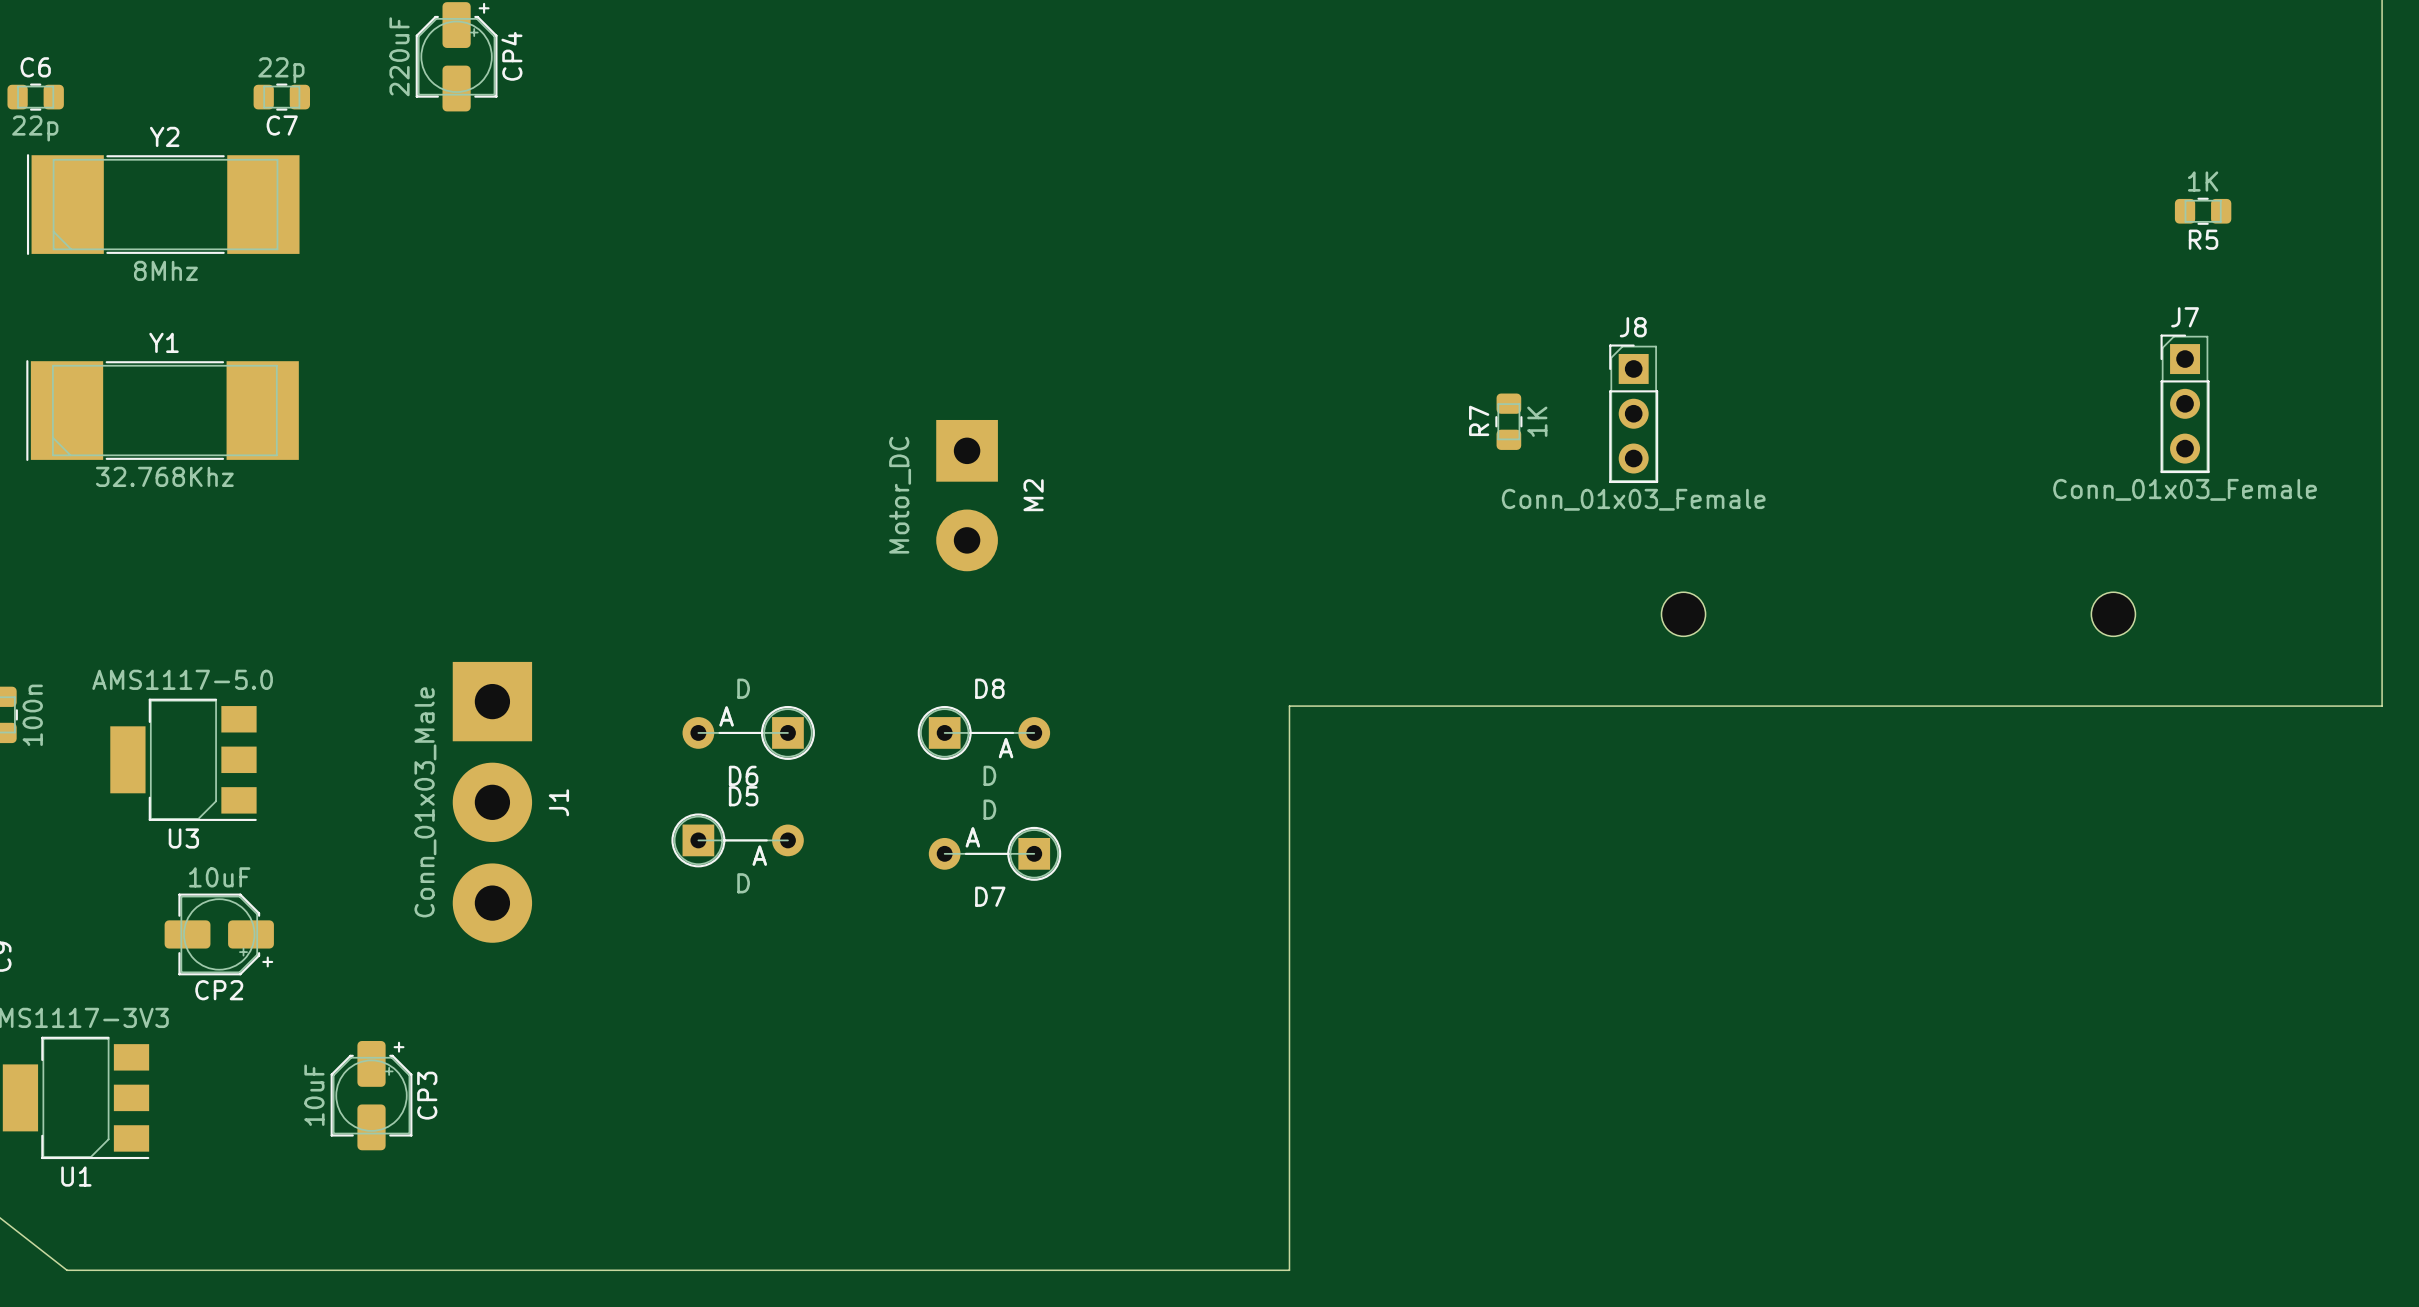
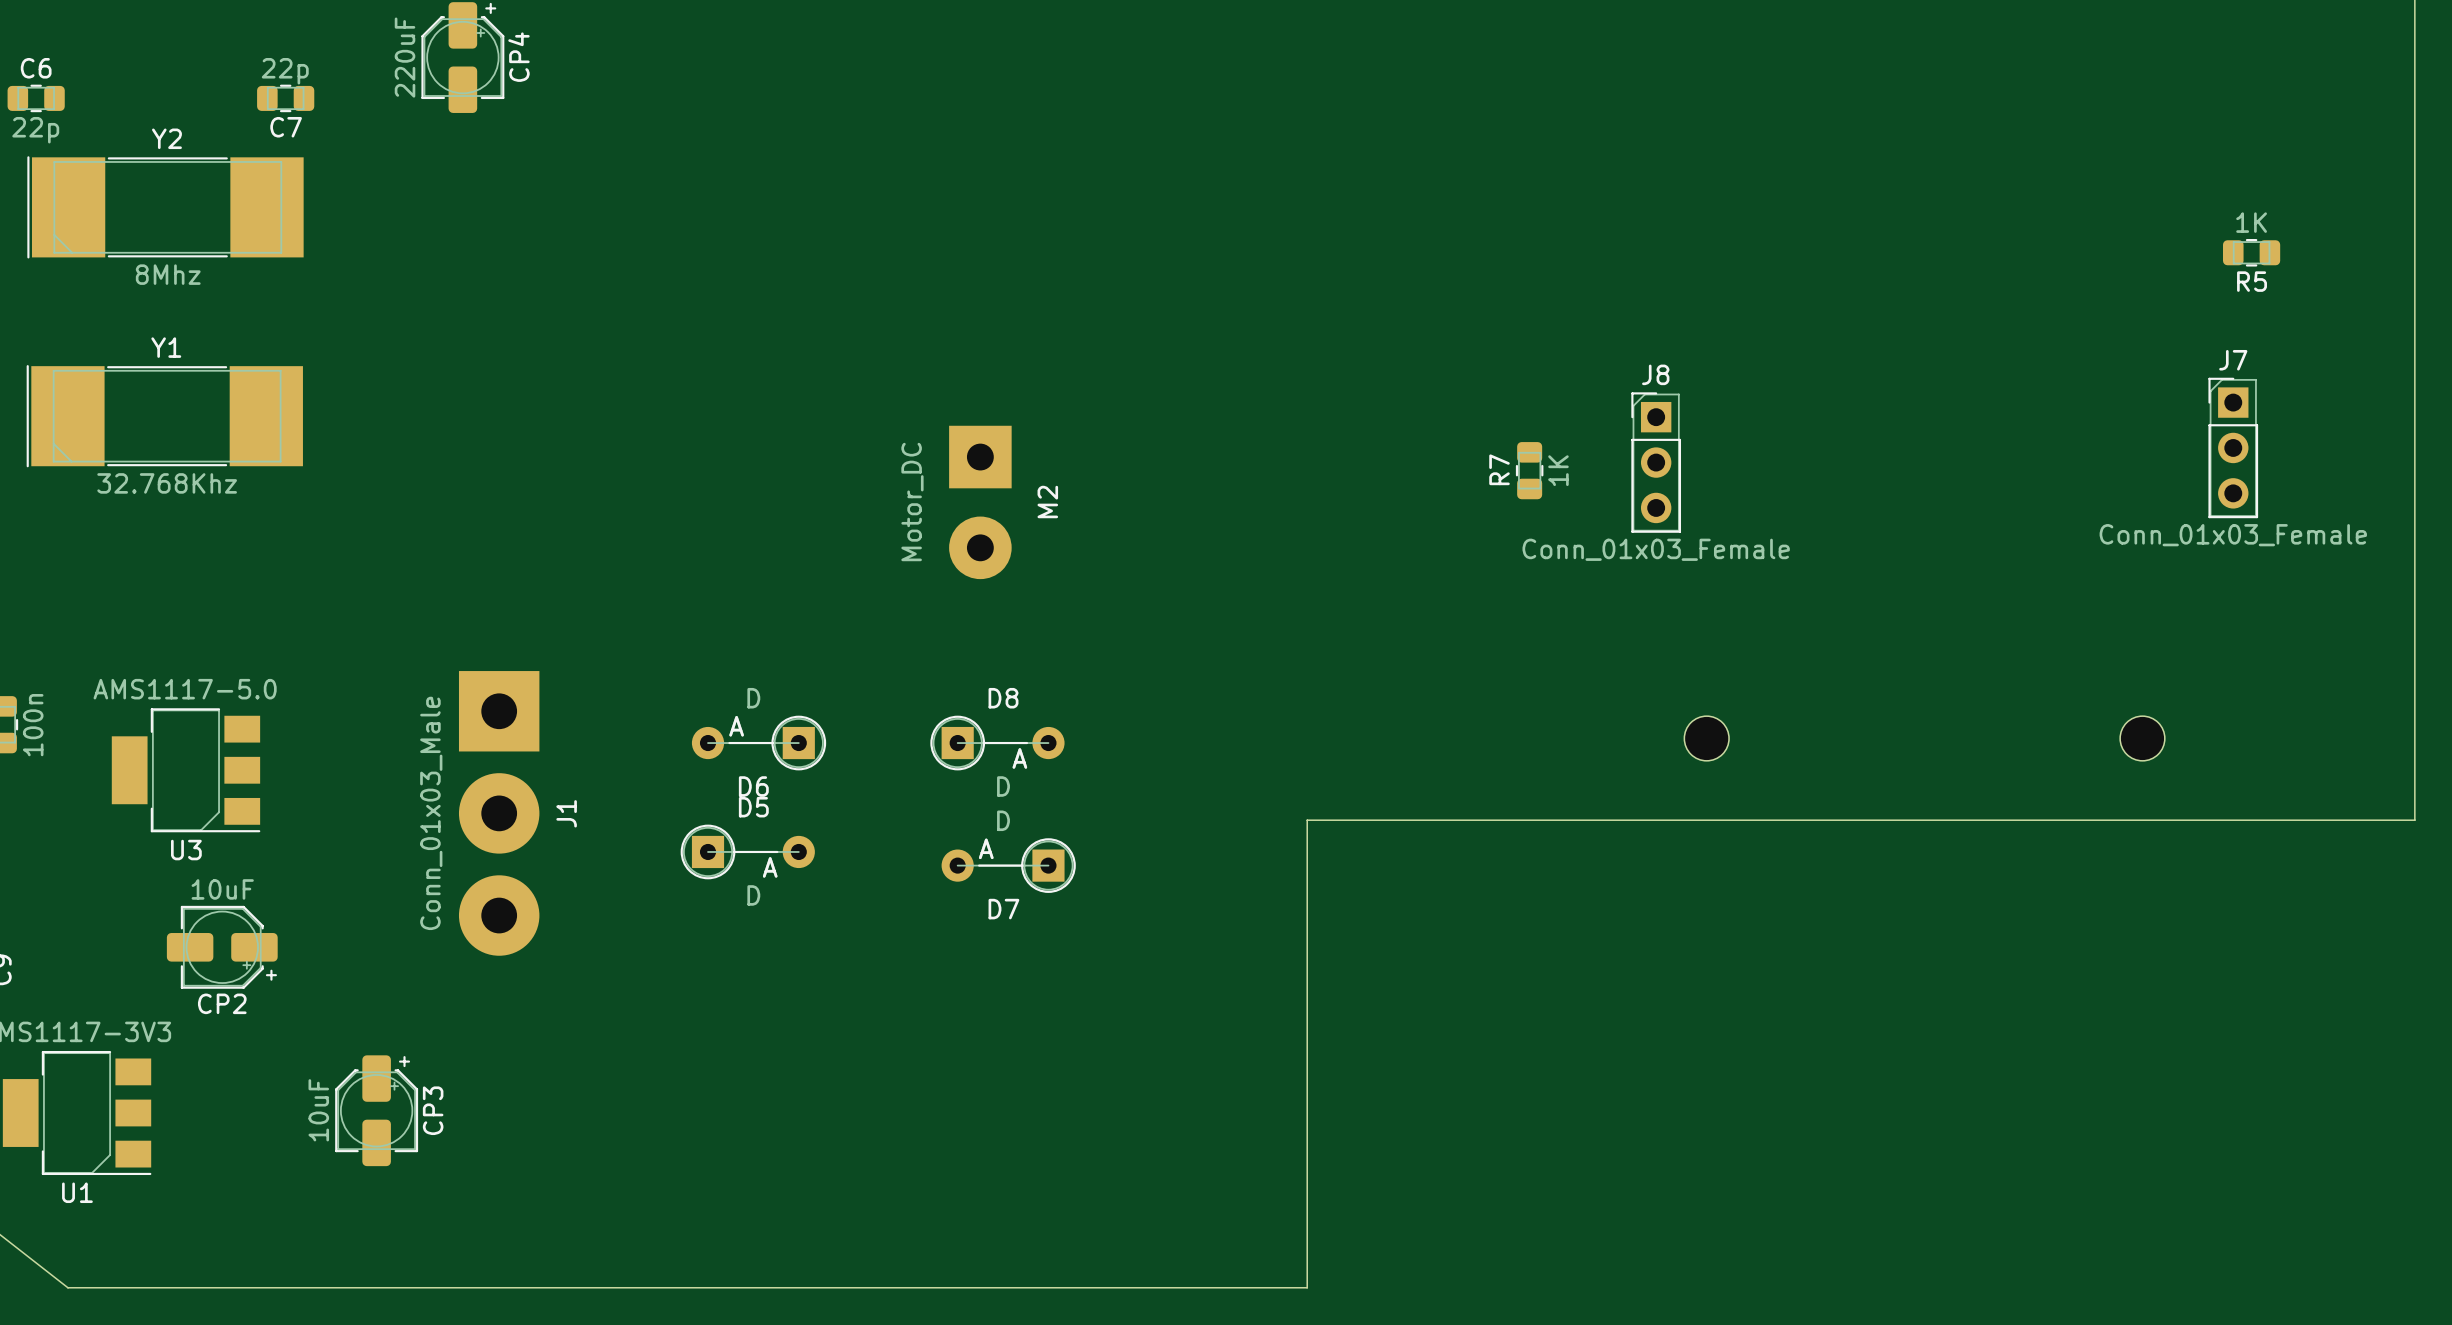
R5 position: (2203, 211) -> (2251, 252)
J7 position: (2185, 403) -> (2233, 447)
J8 position: (1633, 413) -> (1656, 462)
R7 position: (1508, 421) -> (1529, 470)
part position: (1683, 614) -> (1706, 738)
part position: (2113, 614) -> (2142, 738)
board edge: (2382, 706) (1289, 706) (1289, 809) -> (2414, 715) (2414, 820) (1307, 820)

